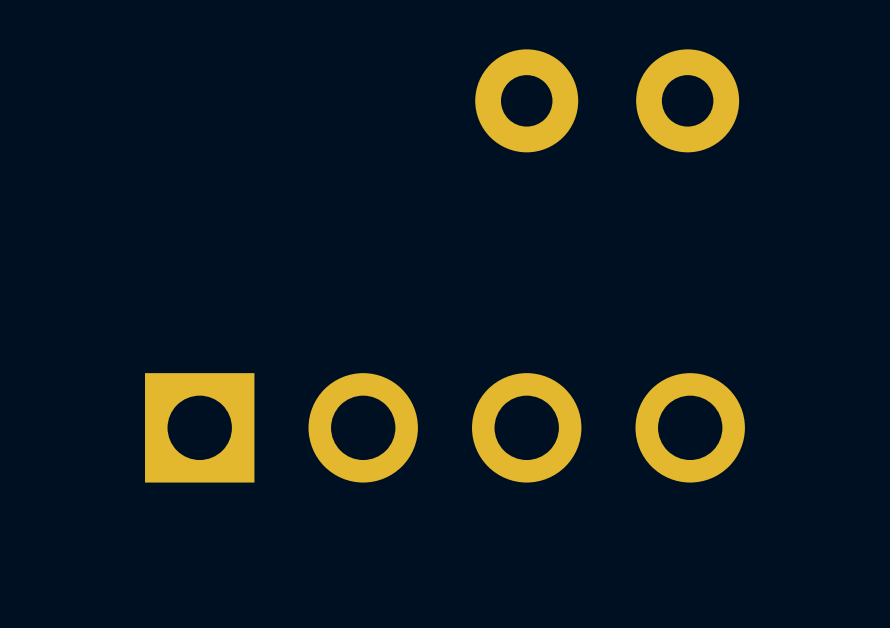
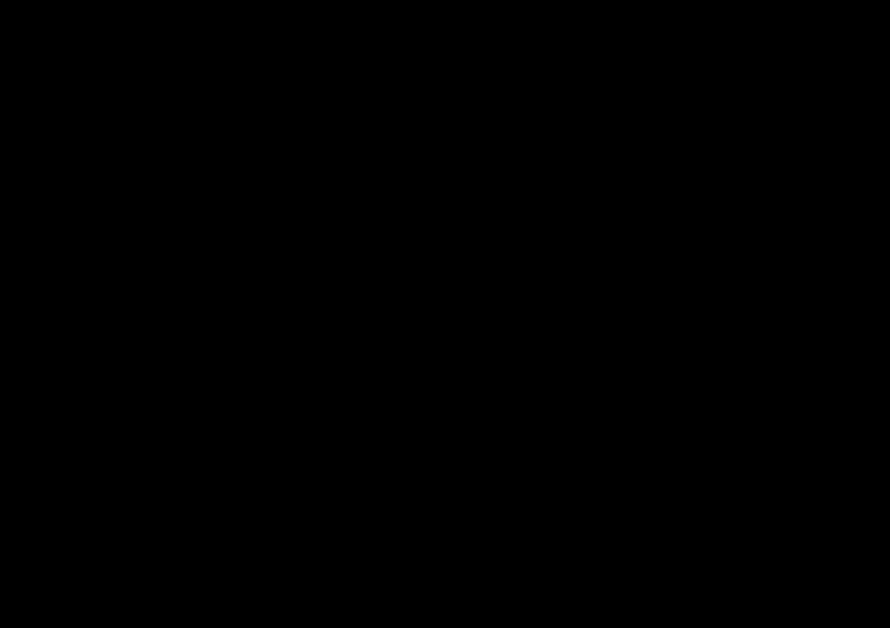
part: (607, 100) -> none
part: (444, 427) -> none

